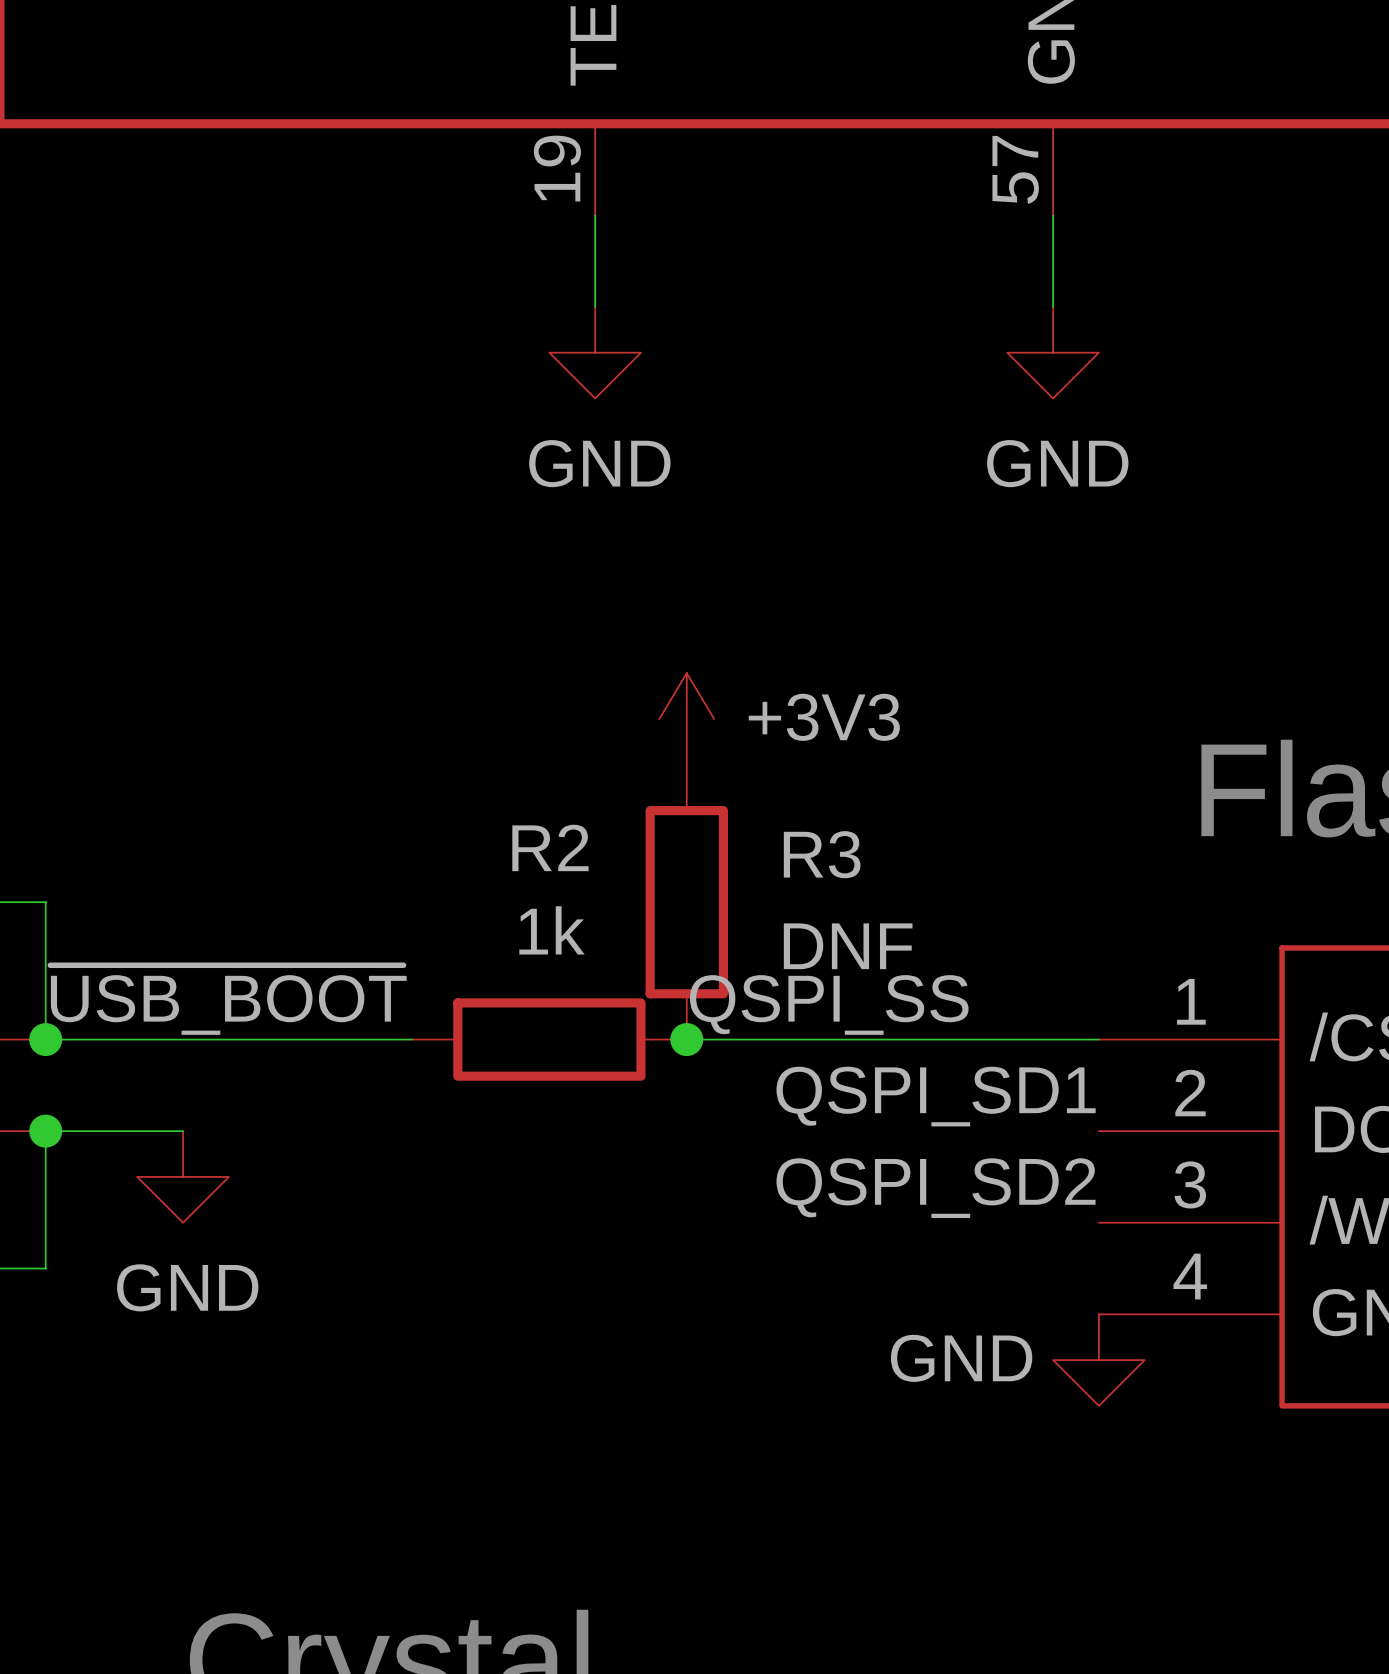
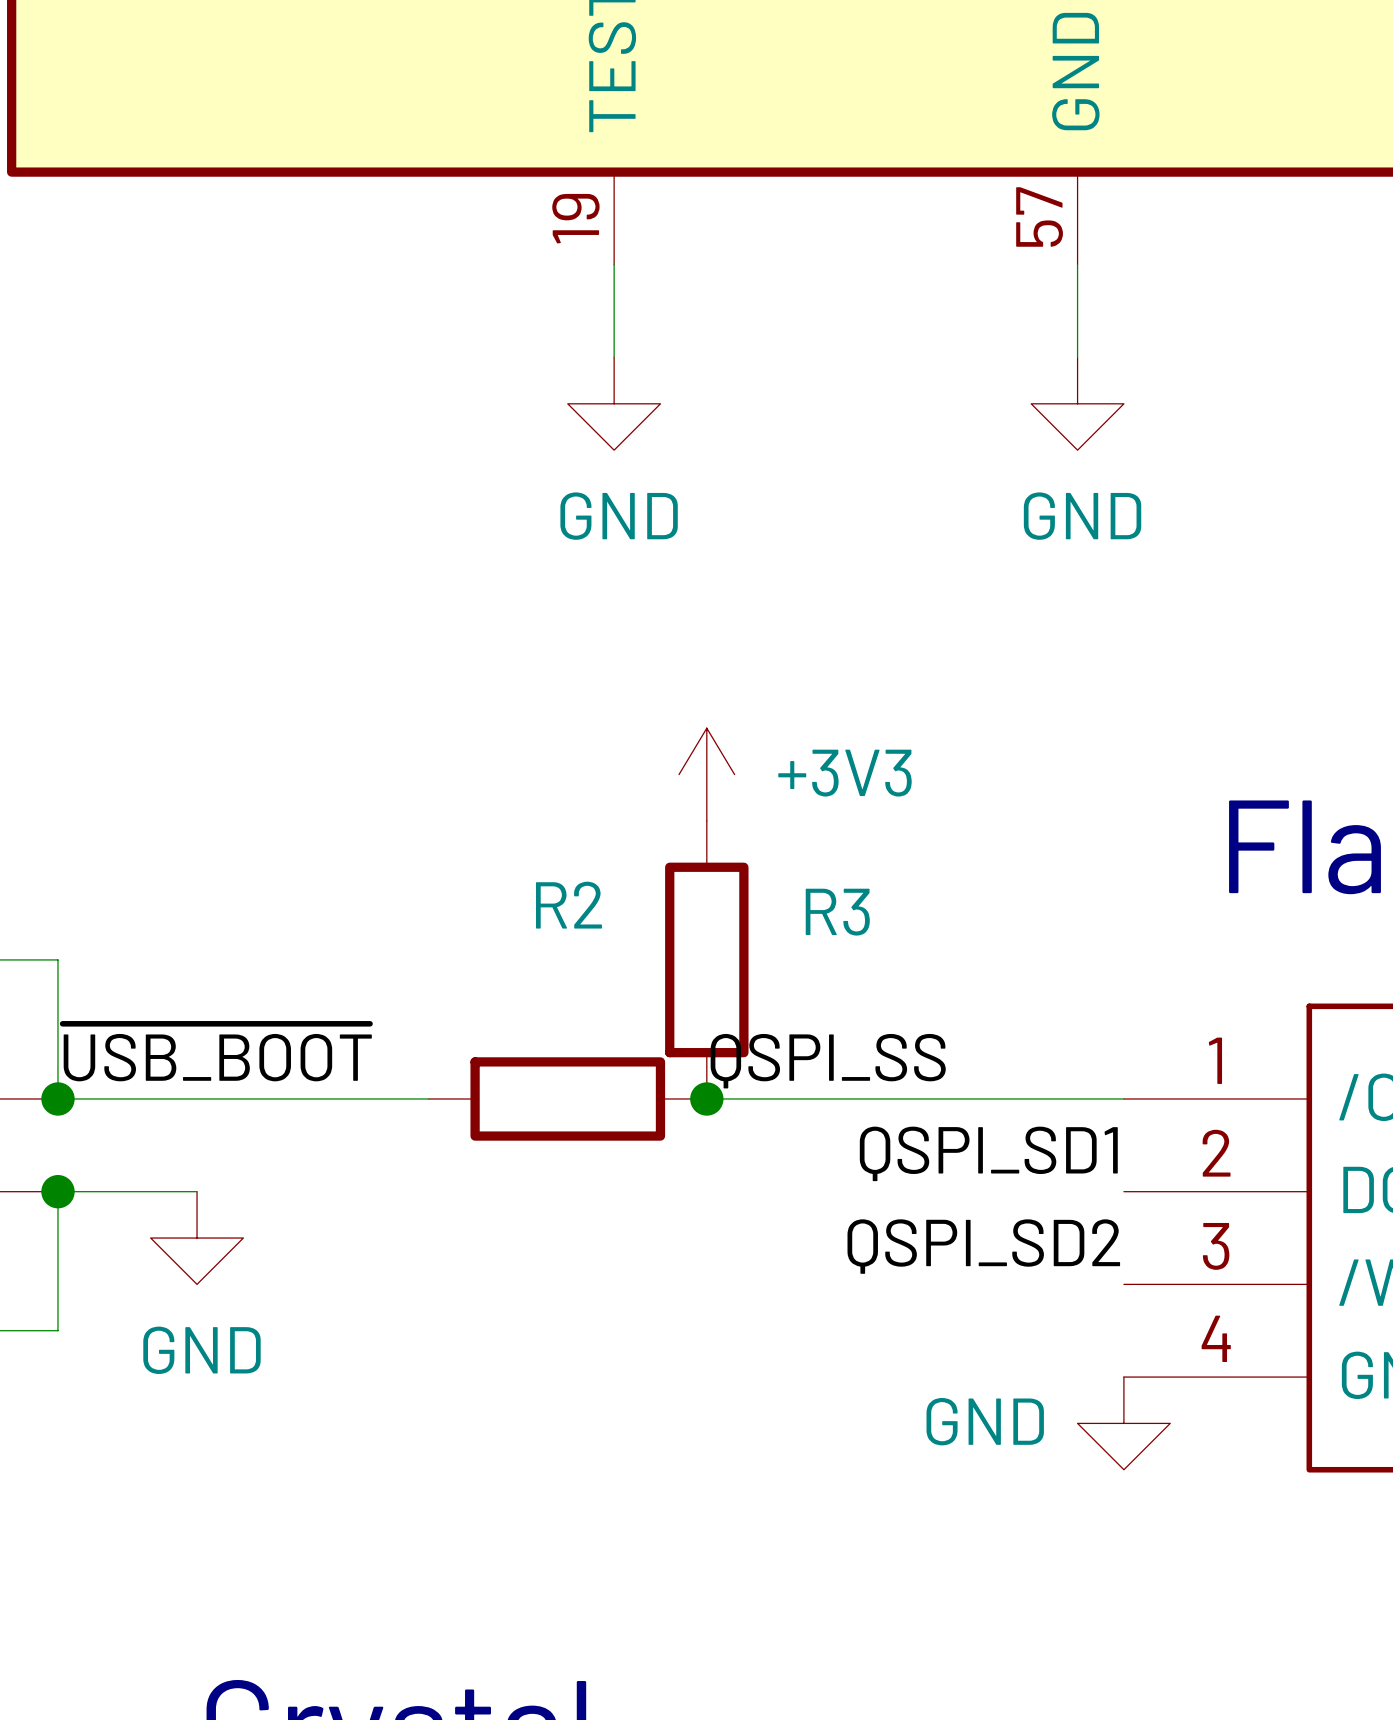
R2 value: 1k (551, 930) -> none
R3 value: DNF (848, 946) -> none

